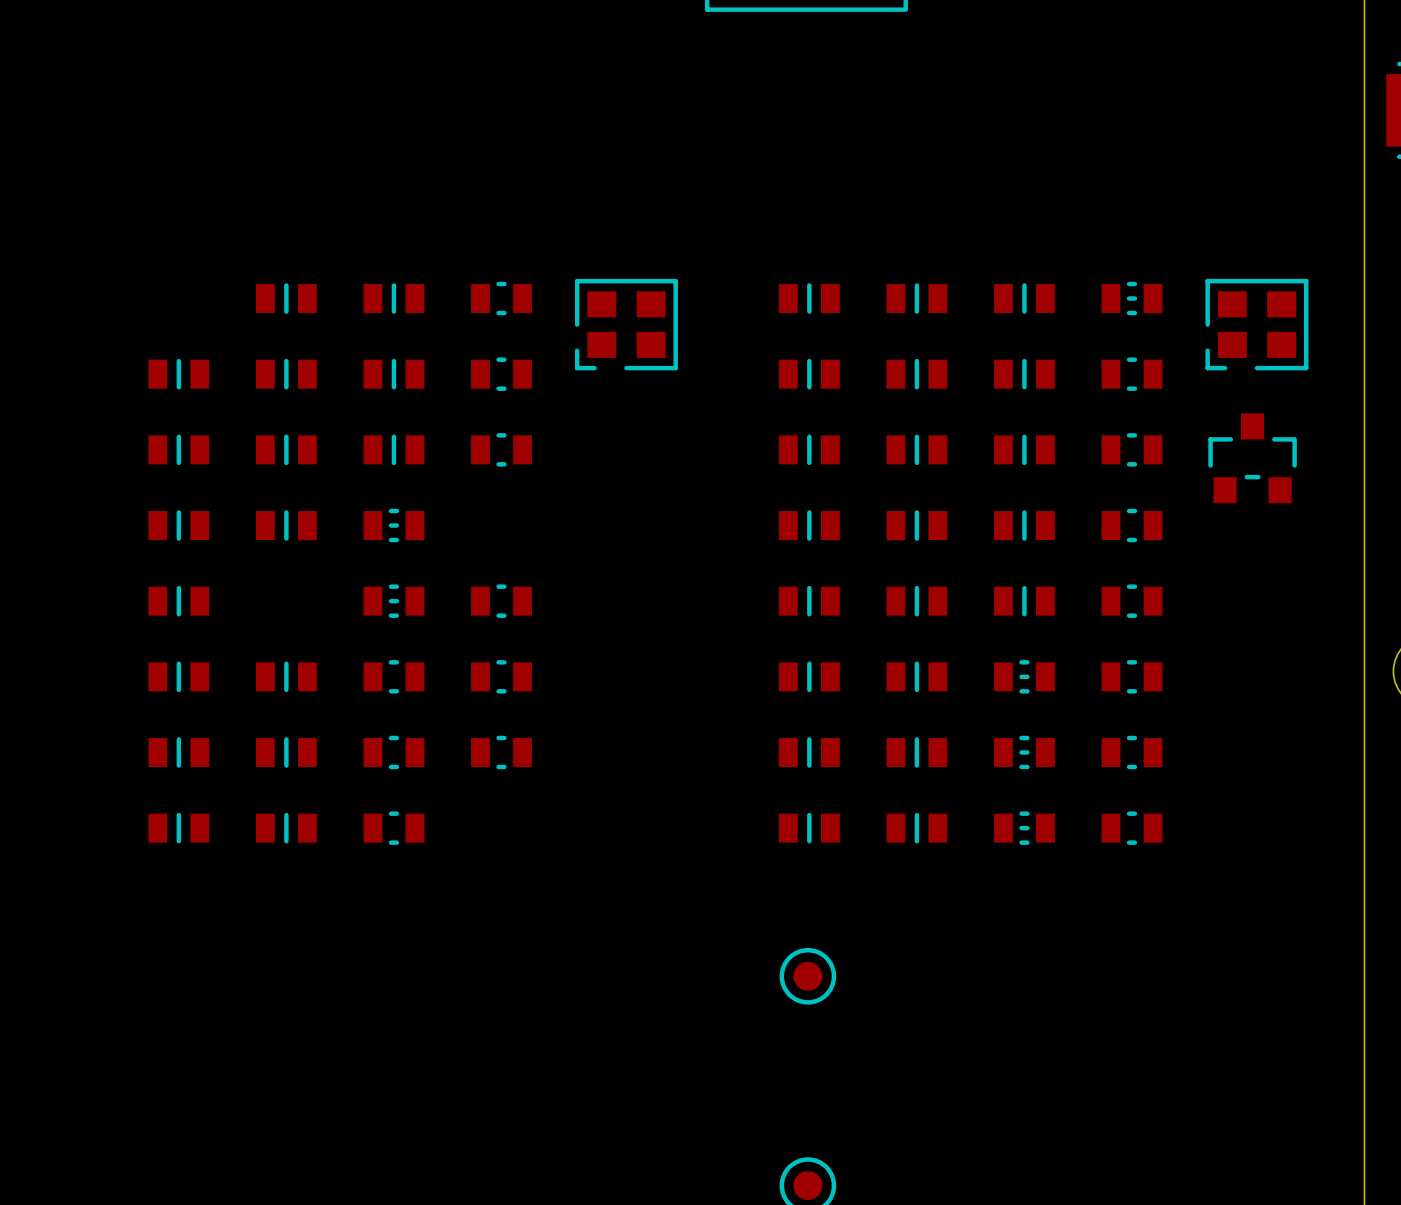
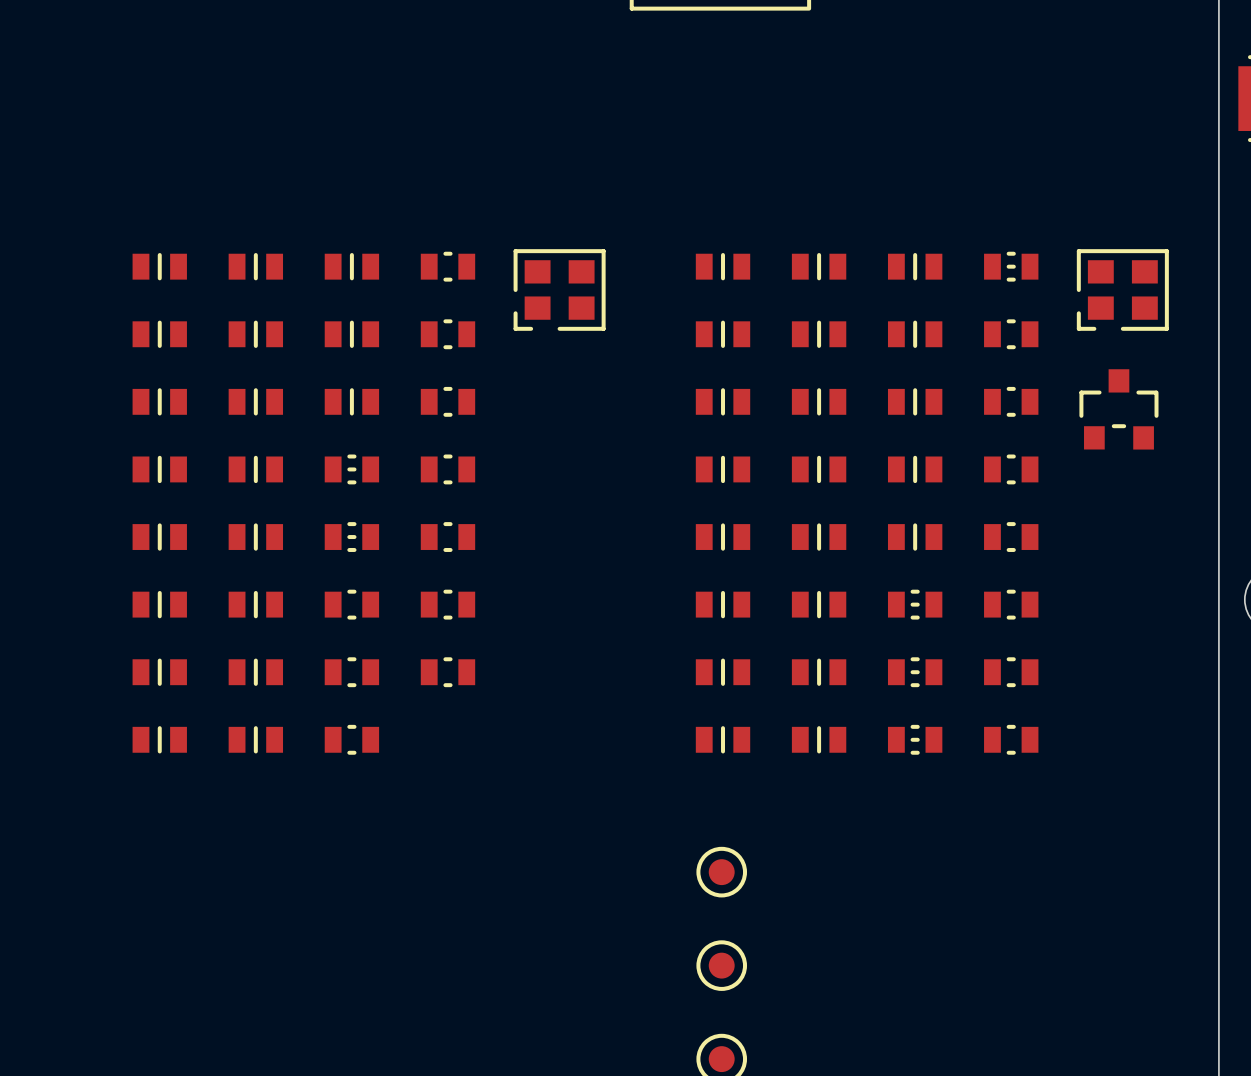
part: none -> (159, 266)
part: none -> (447, 469)
part: none -> (255, 537)
part: none -> (721, 965)

